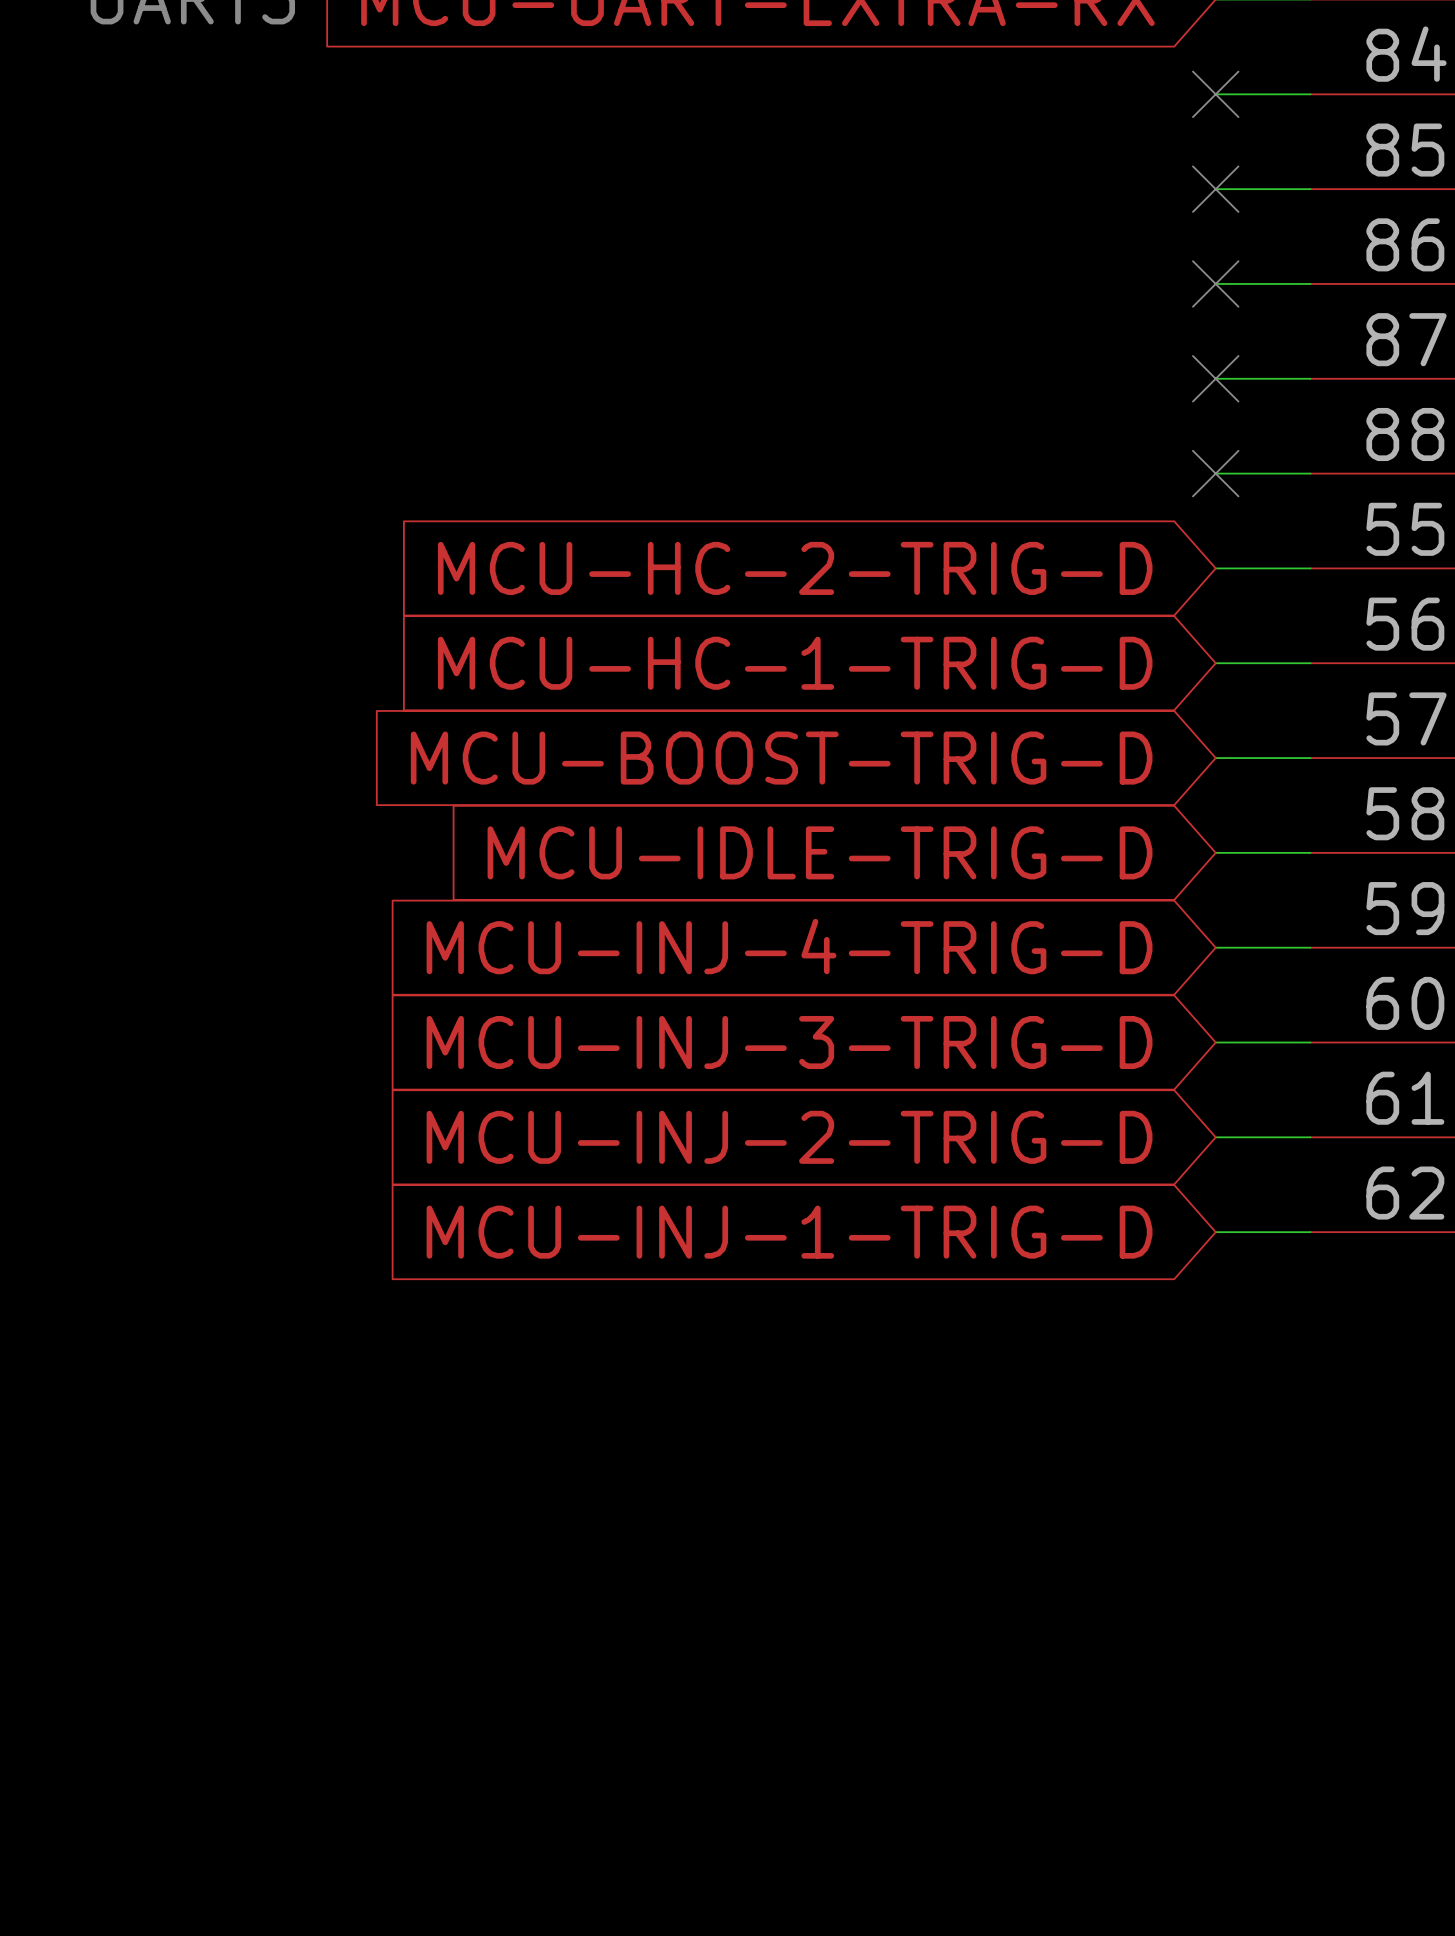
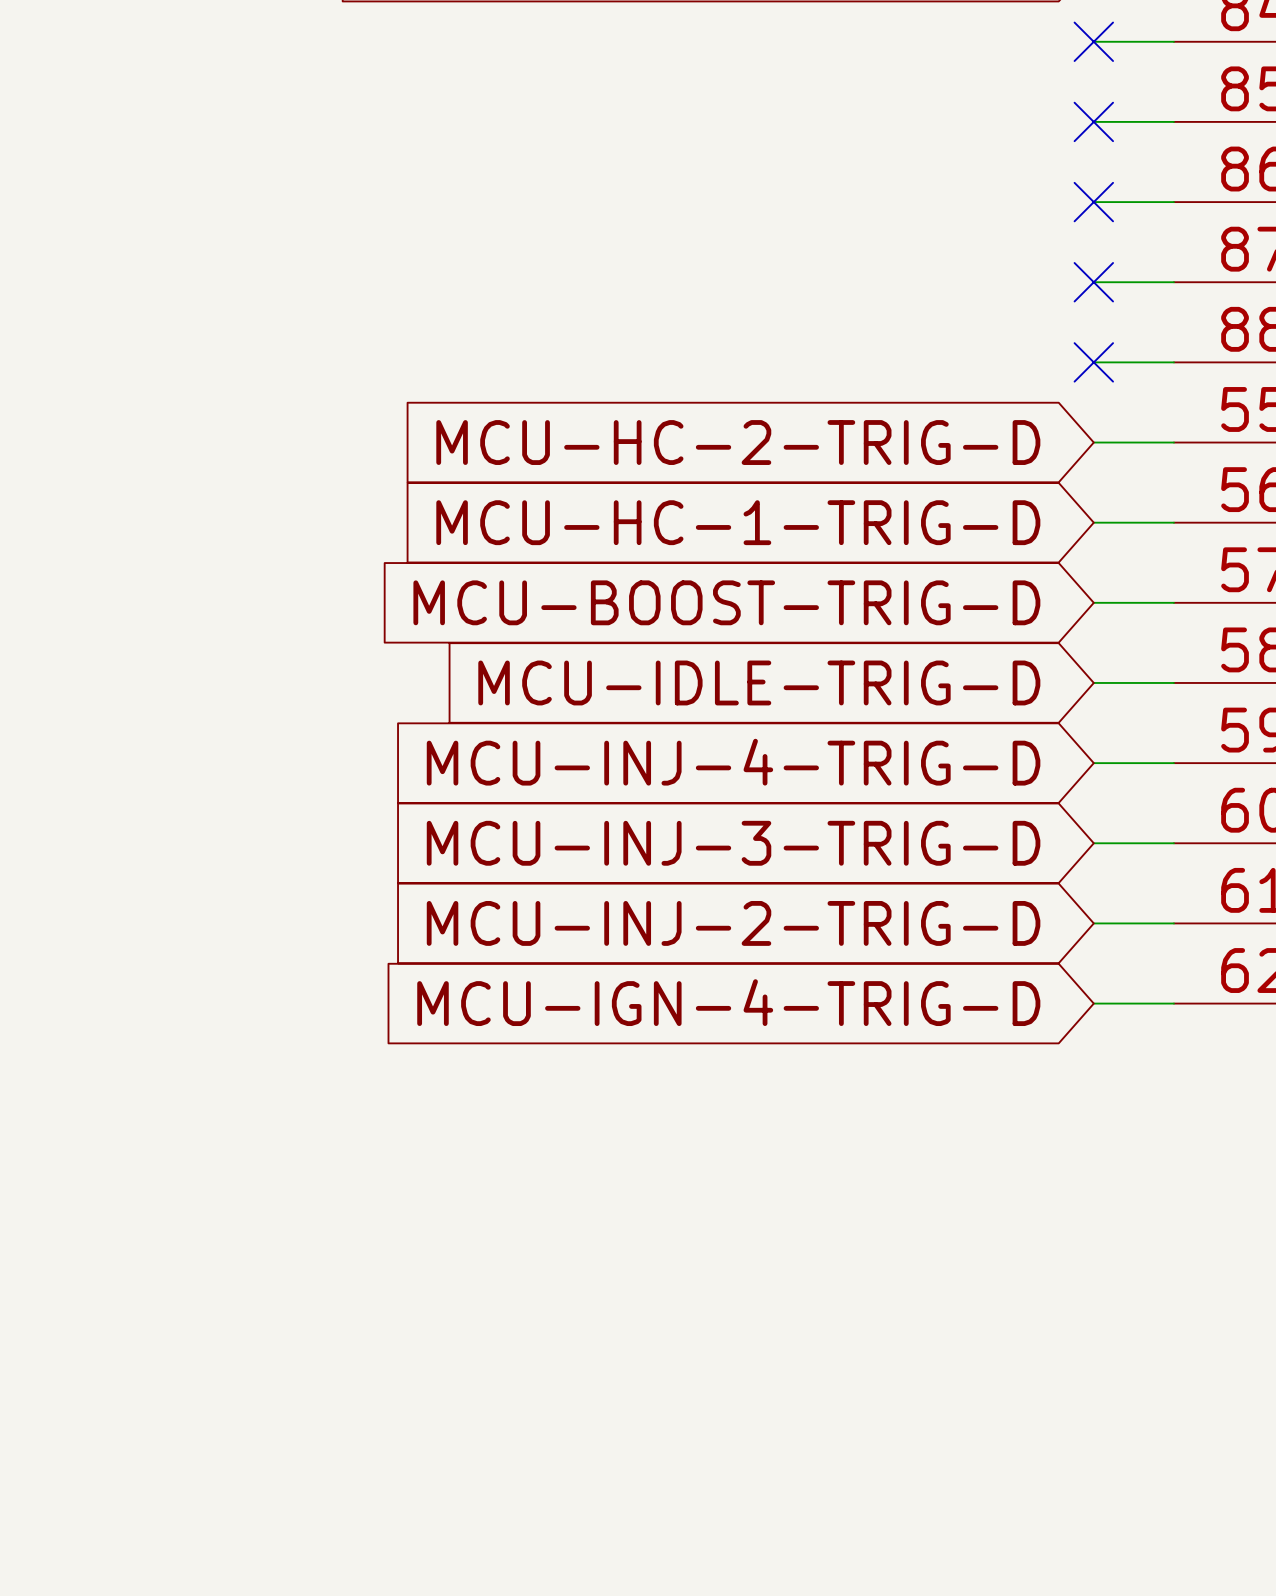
global label: MCU-INJ-1-TRIG-D (789, 1232) -> MCU-IGN-4-TRIG-D (728, 1002)

